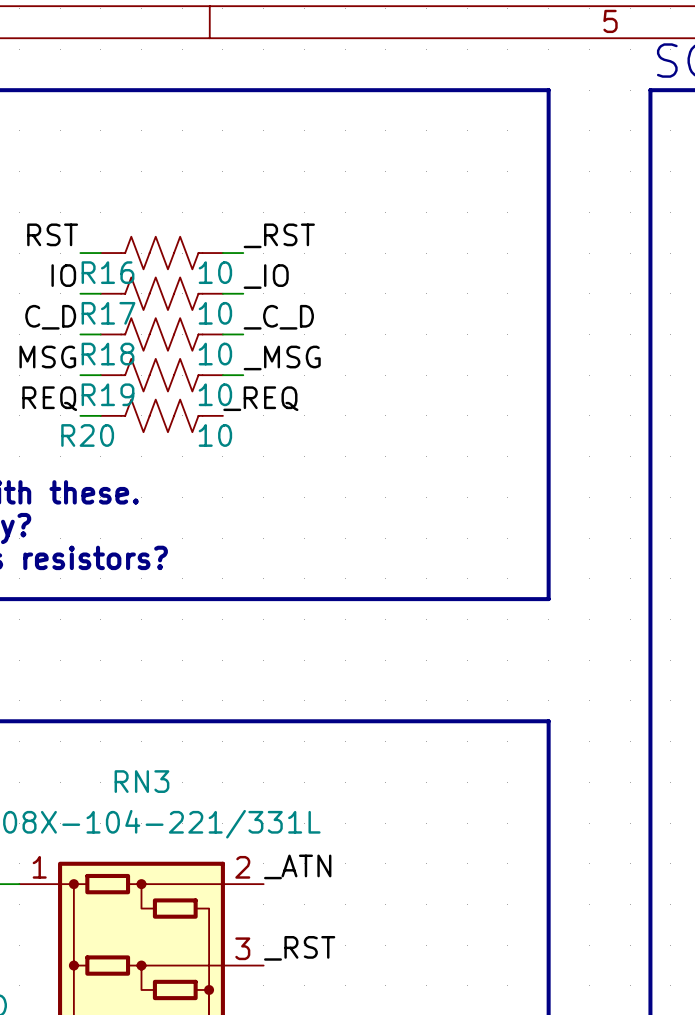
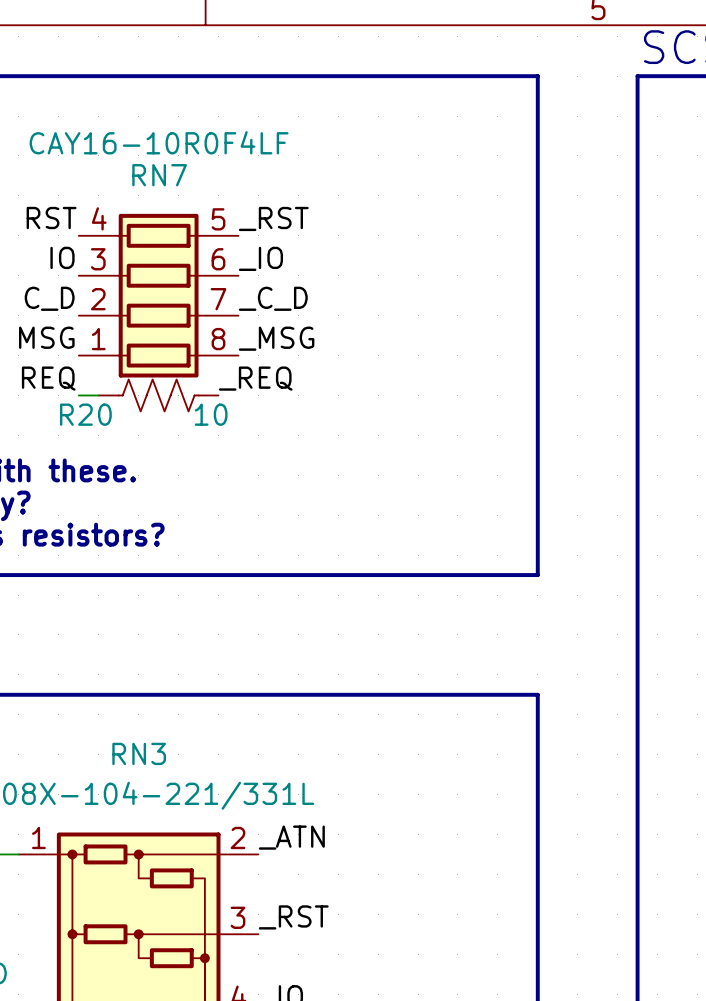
R16: 10 (161, 253) -> none
R17: 10 (161, 293) -> none
RN7: none -> CAY16-10R0F4LF (158, 295)
R18: 10 (161, 334) -> none
R19: 10 (161, 375) -> none

